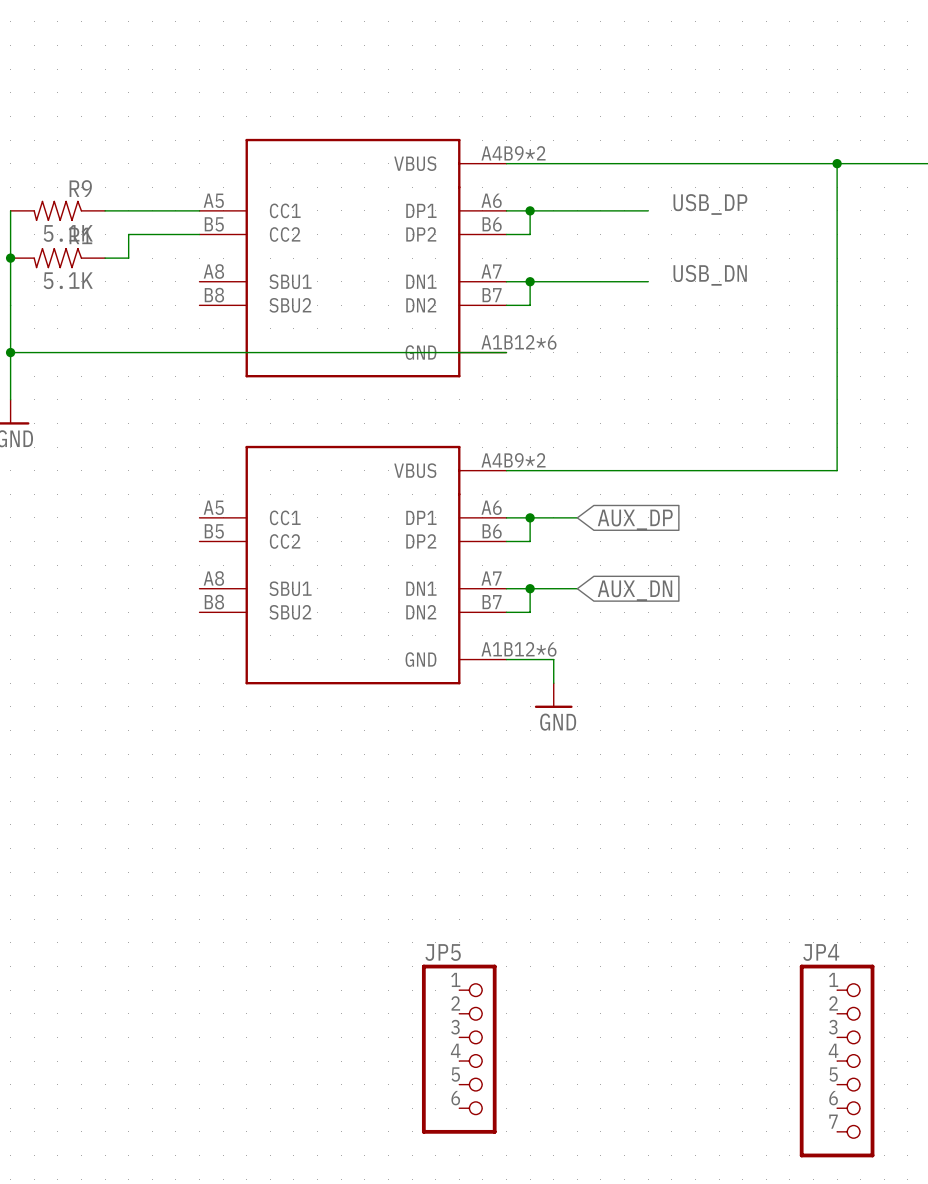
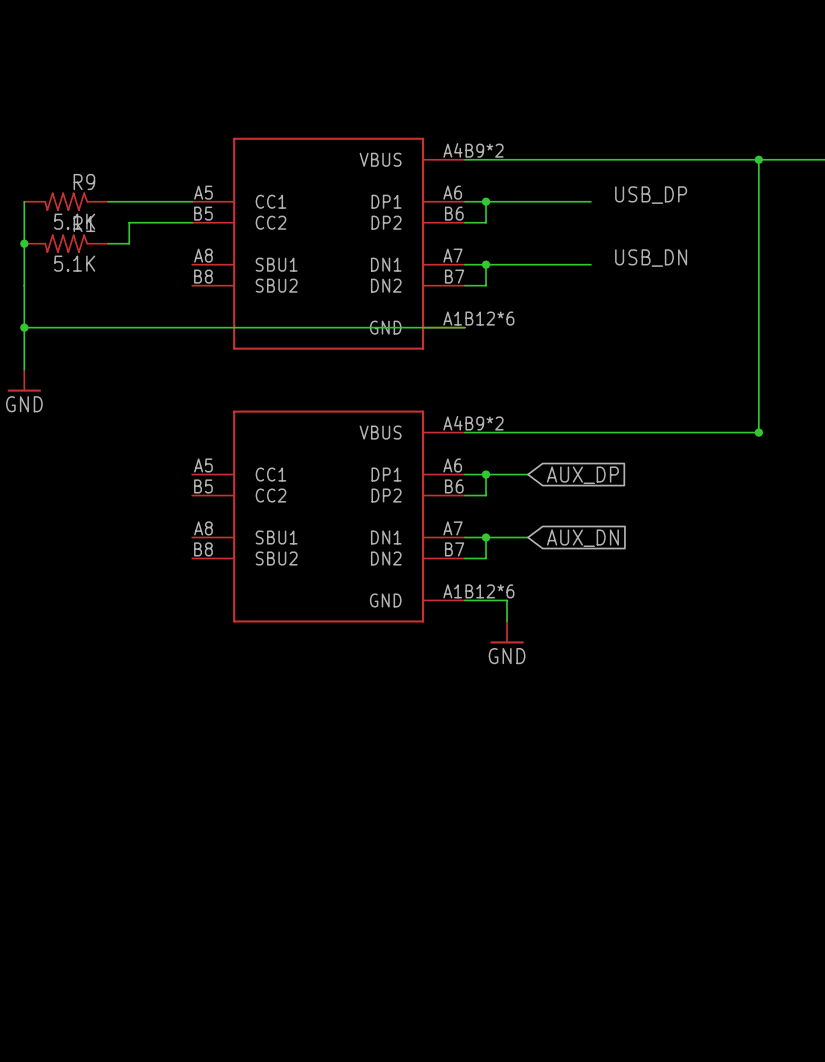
junction: none -> (758, 432)
JP5: (459, 1049) -> none
JP4: (837, 1061) -> none

